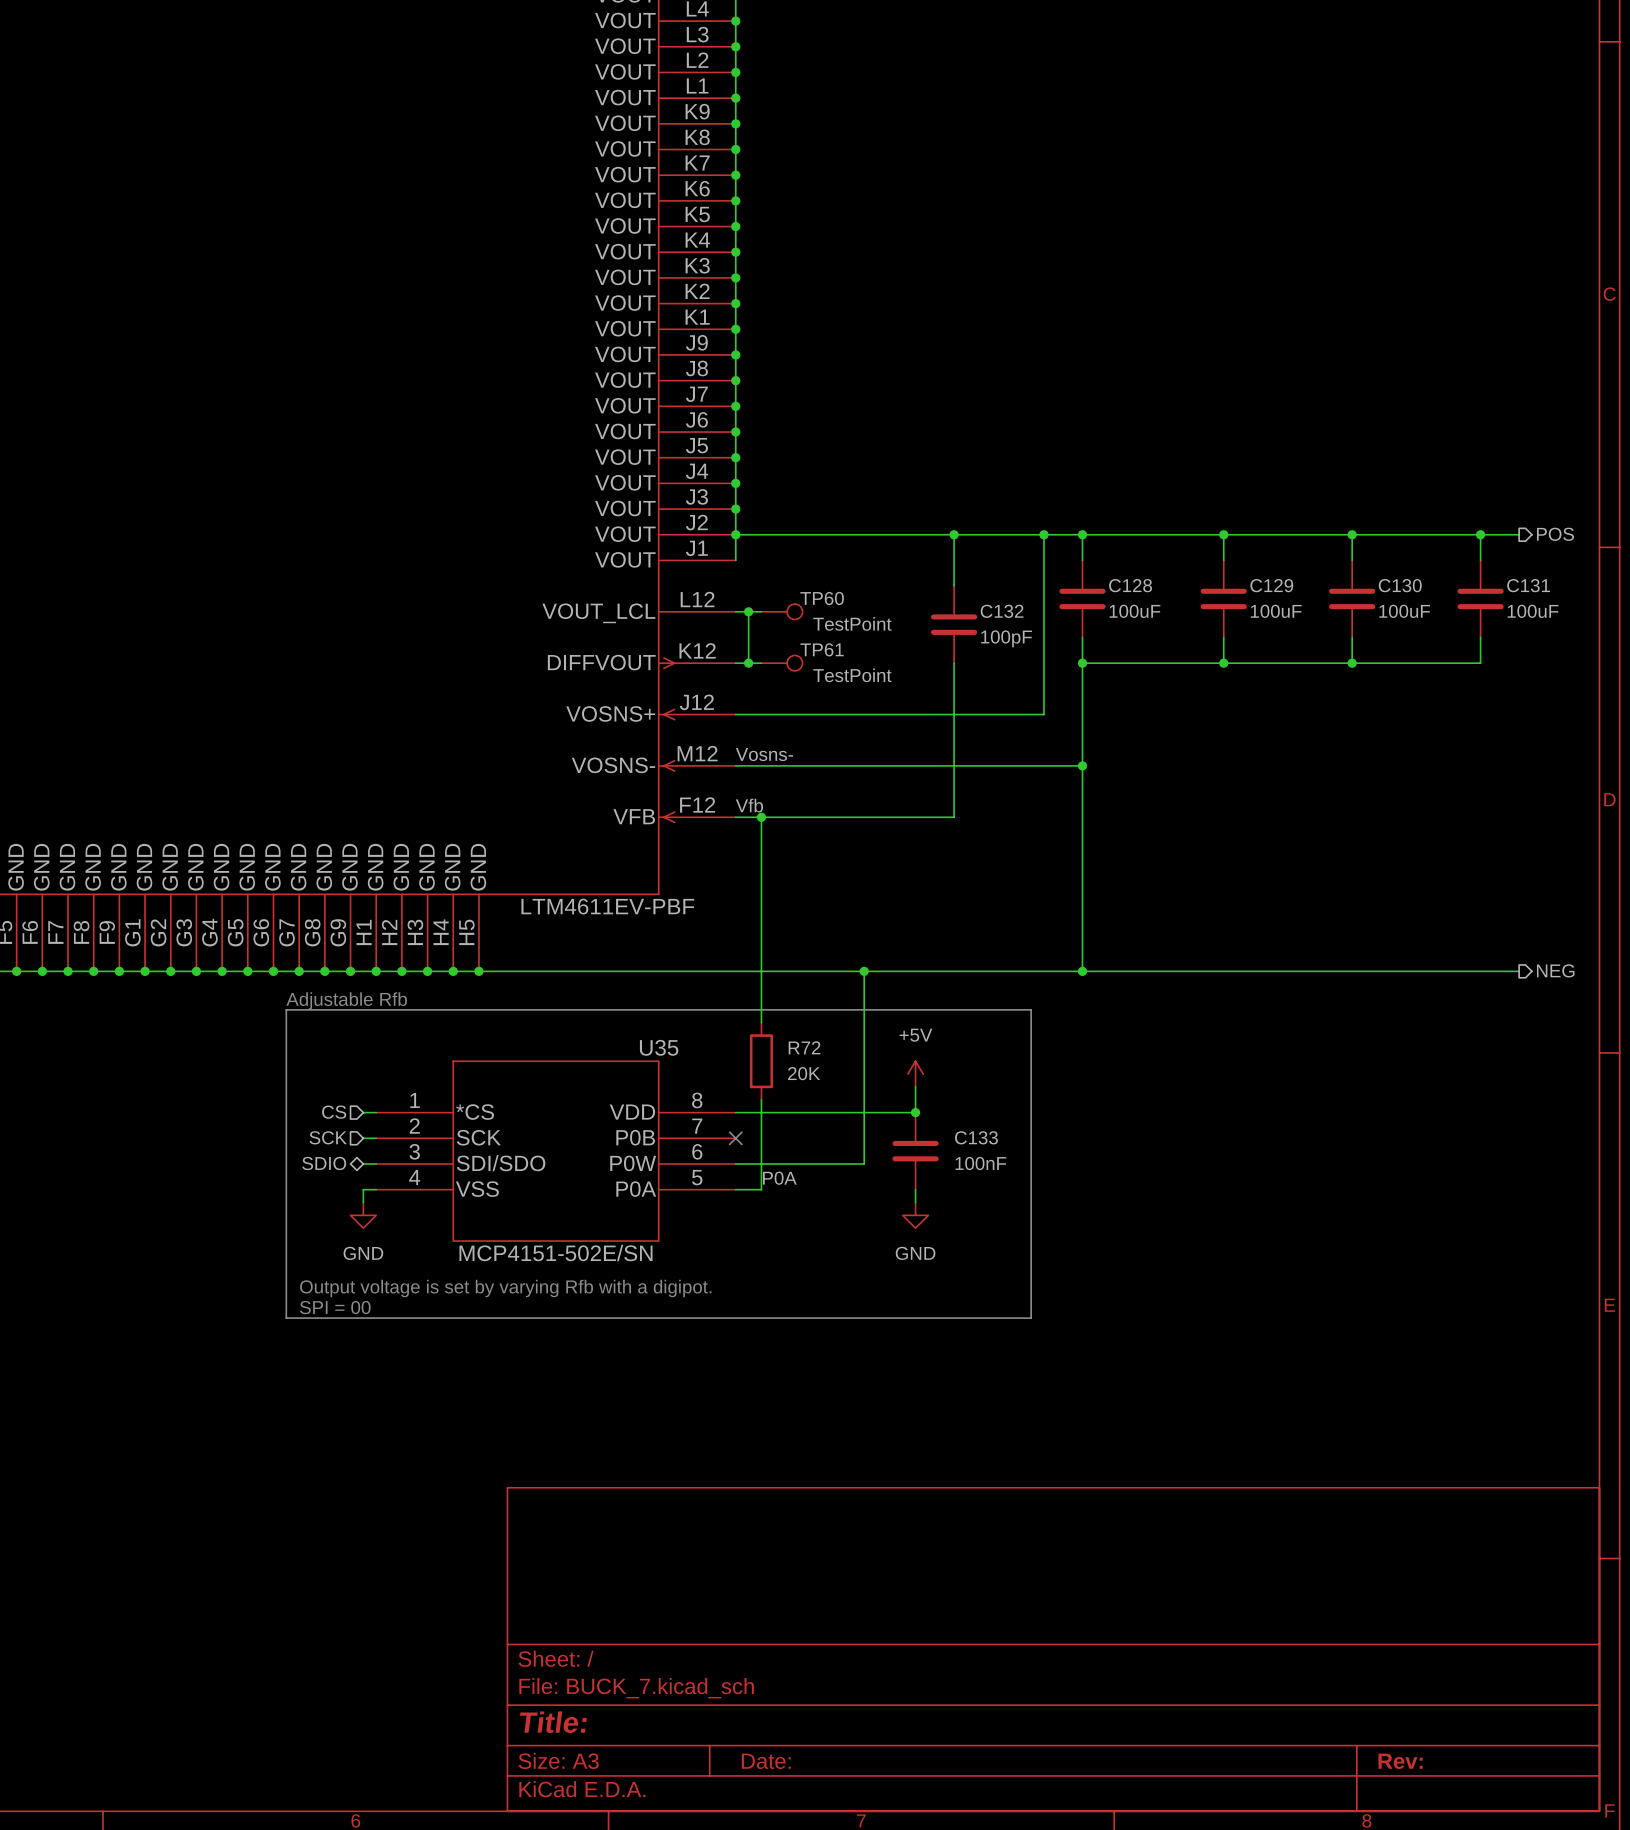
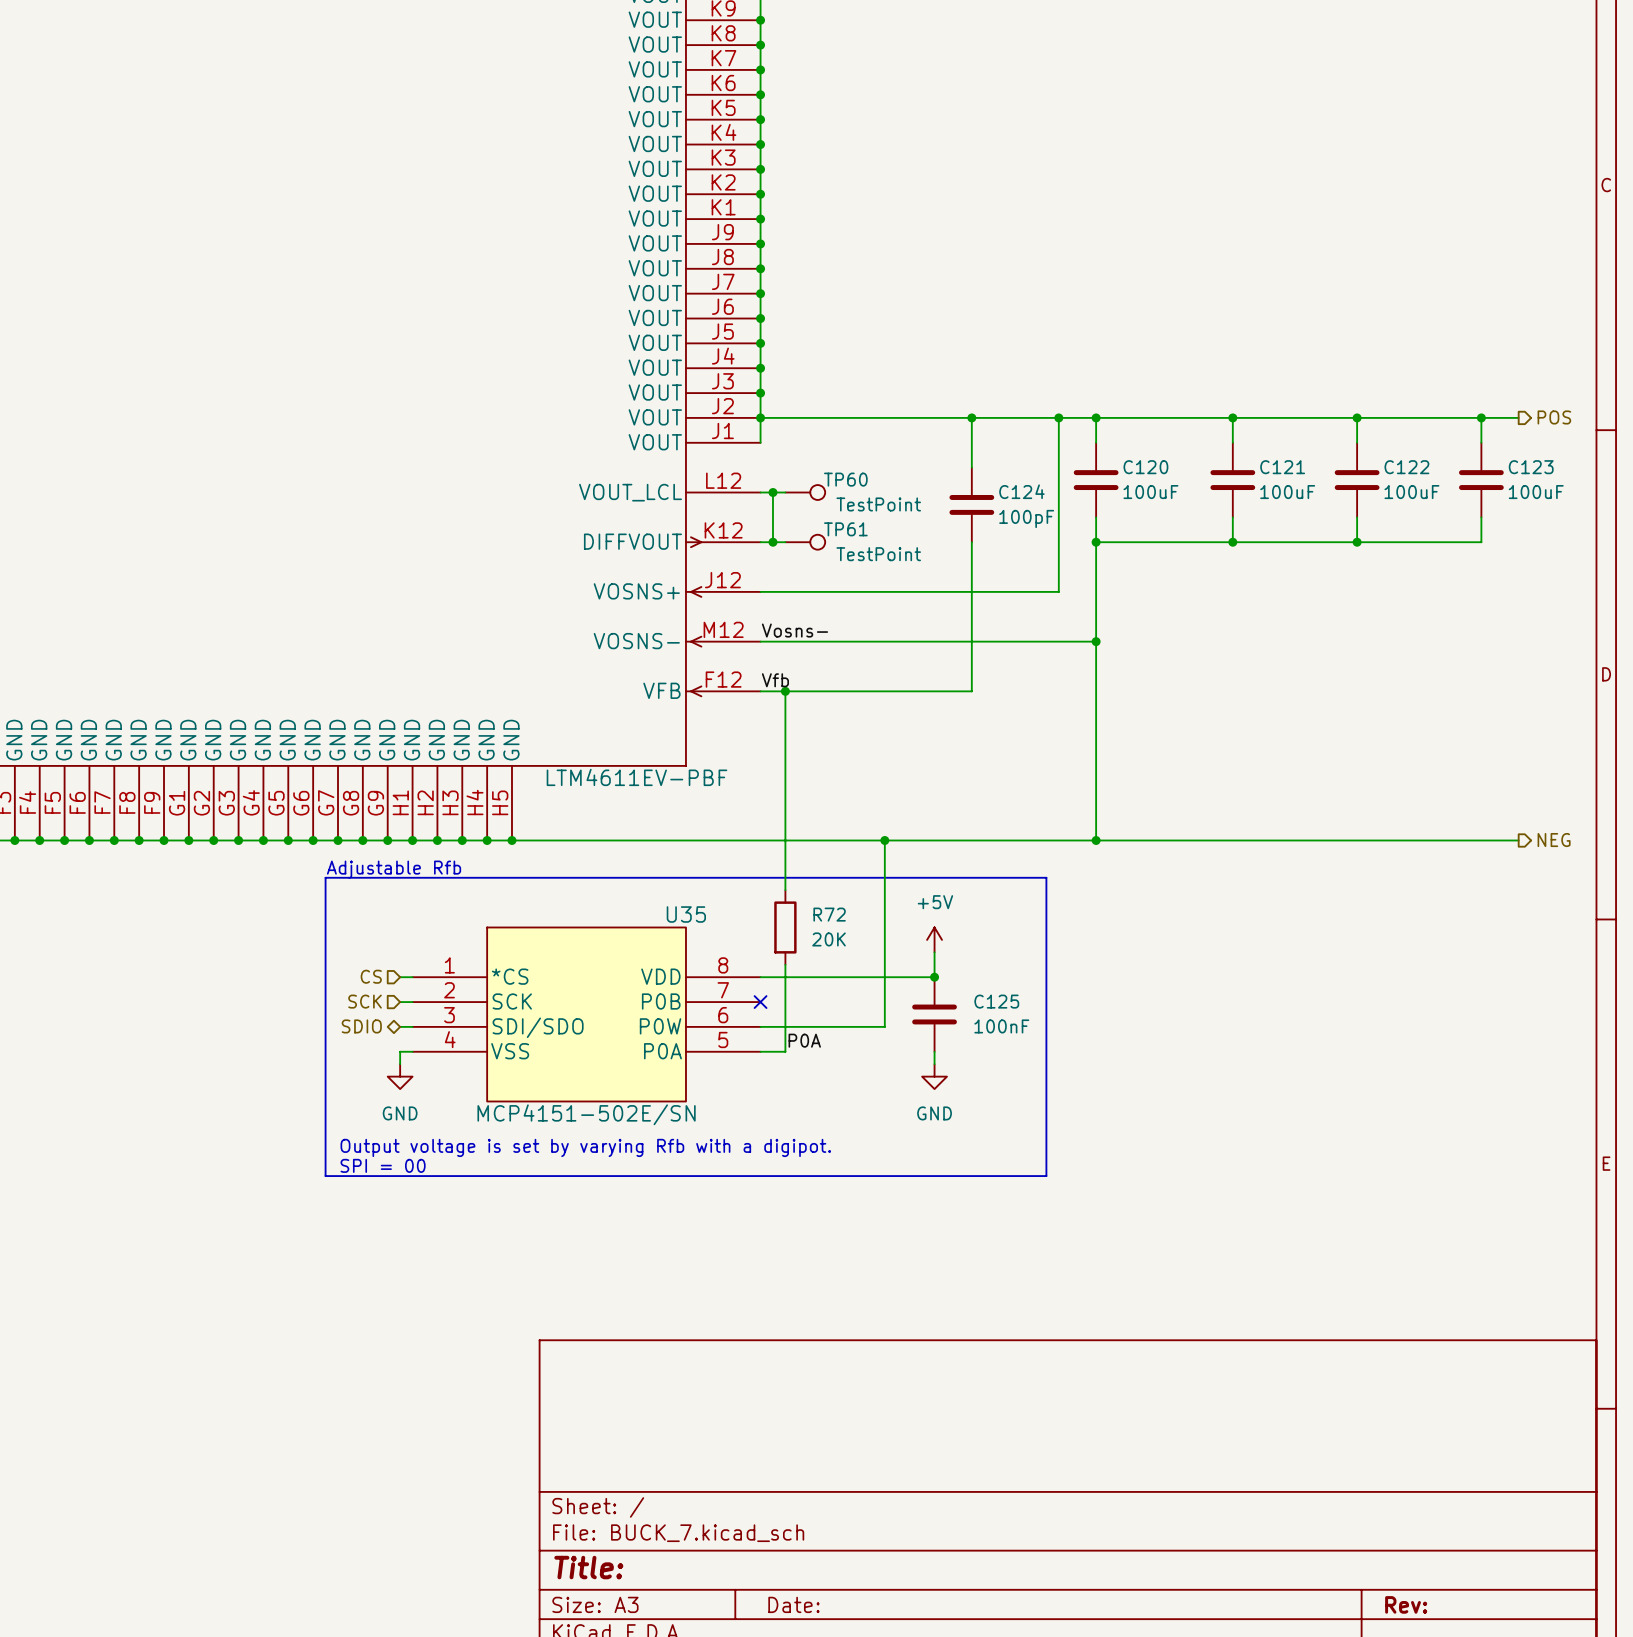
C128 name: C128 (1130, 585) -> C120 (1145, 467)
C129 name: C129 (1271, 585) -> C121 (1282, 467)
C130 name: C130 (1400, 585) -> C122 (1406, 467)
C131 name: C131 (1528, 585) -> C123 (1531, 467)
C132 name: C132 (1002, 611) -> C124 (1021, 491)
C133 name: C133 (976, 1137) -> C125 (996, 1001)

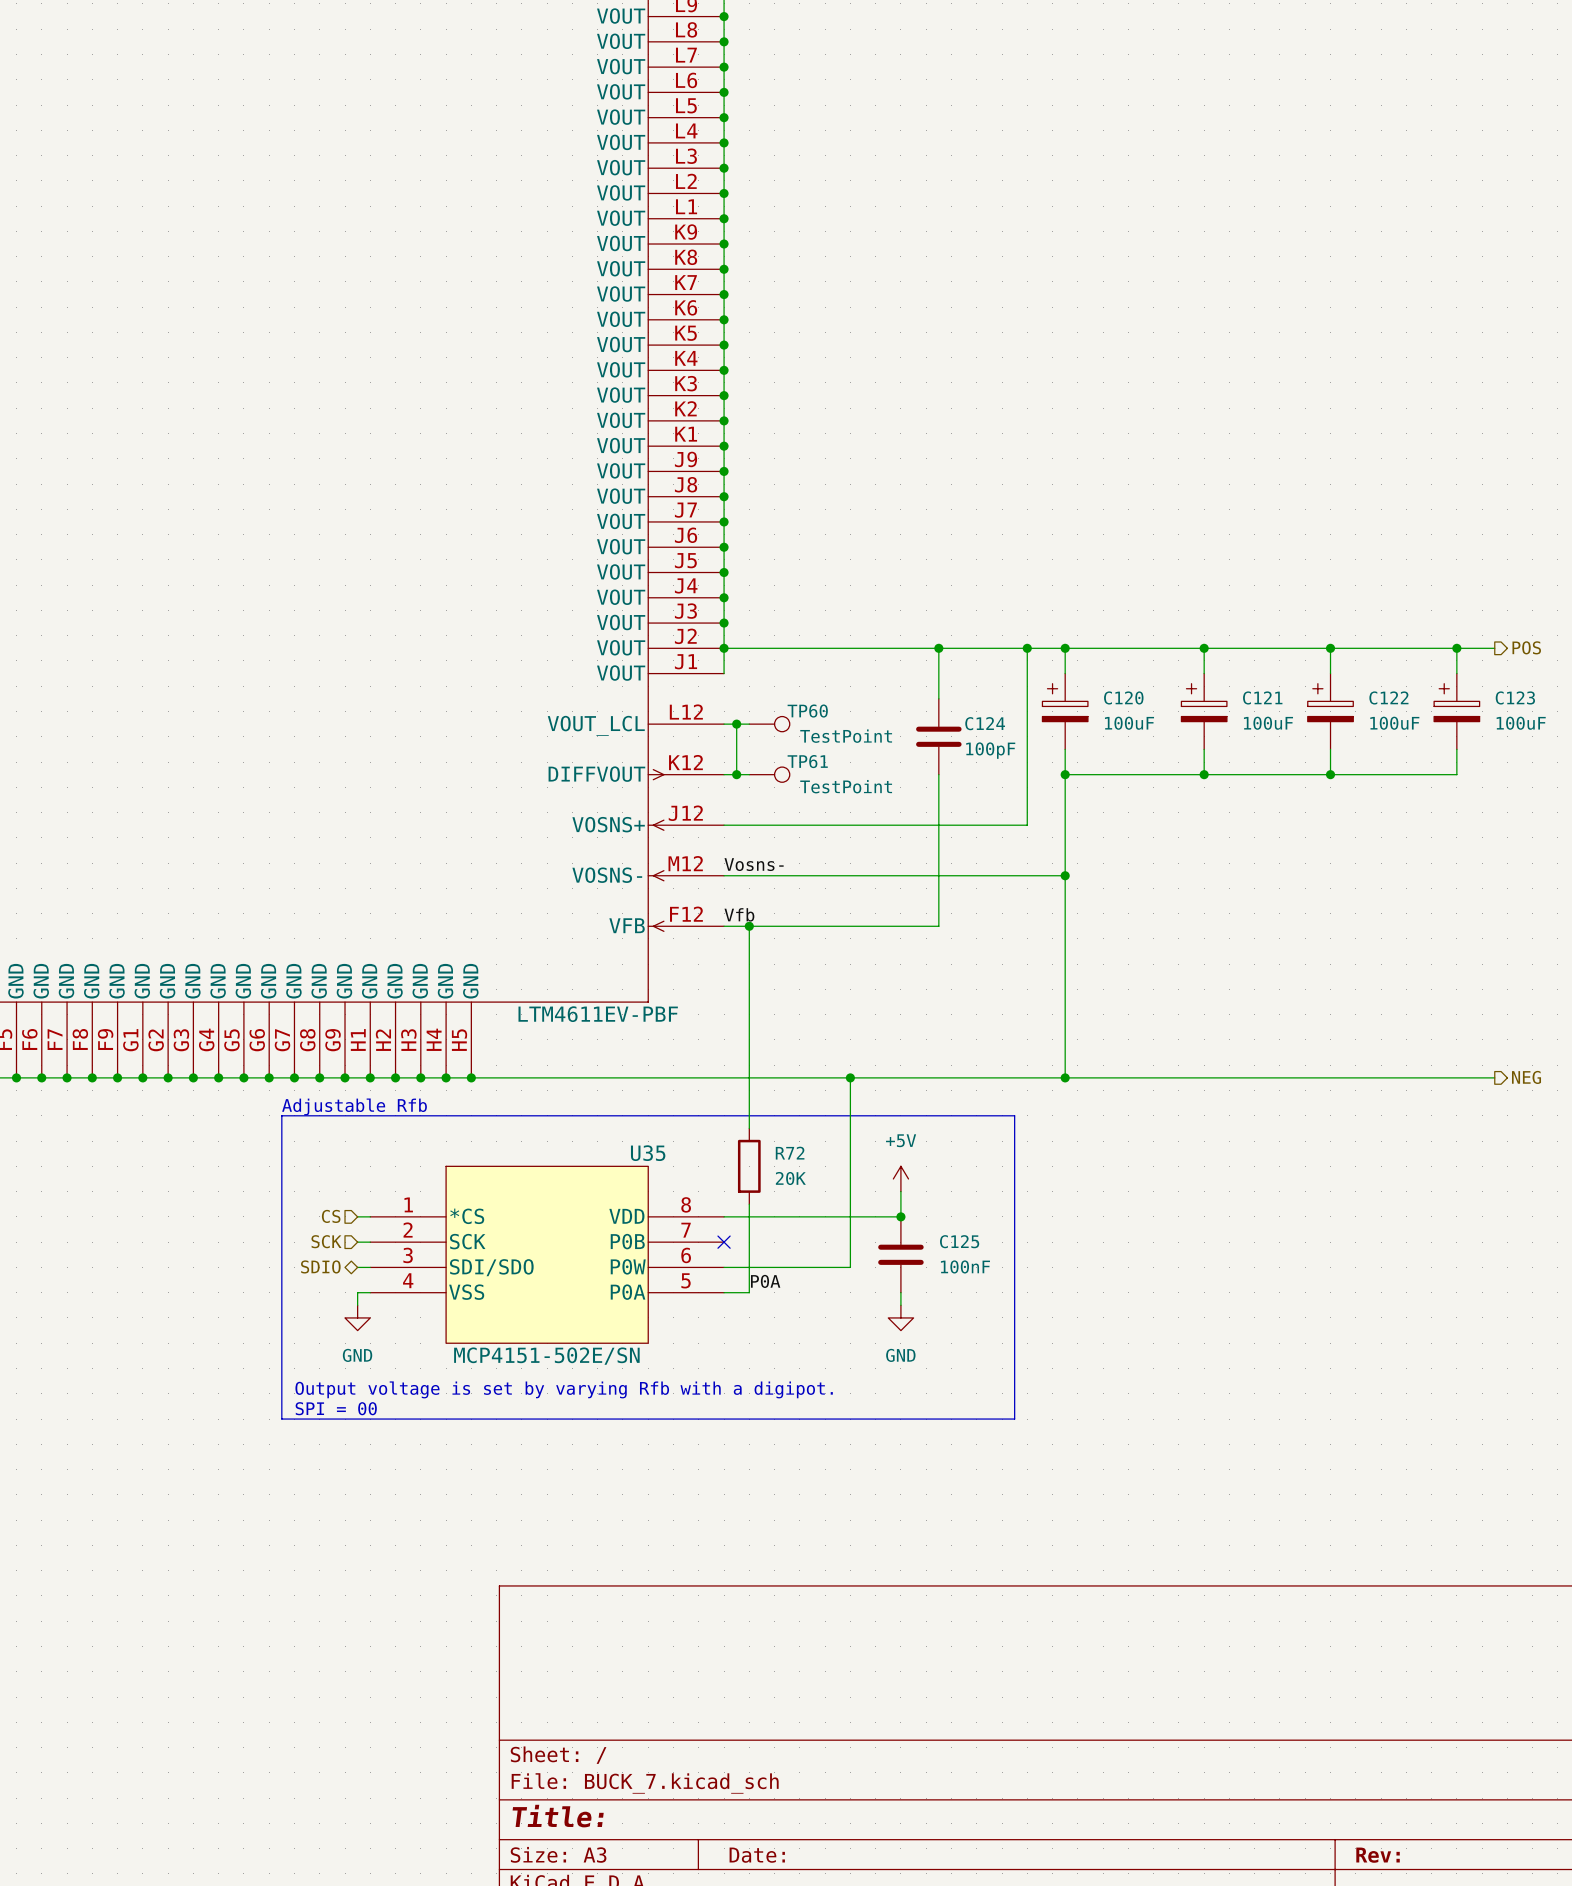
C120 symbol: [1073, 442, 1119, 518] -> [1042, 673, 1088, 750]
C121 symbol: [1210, 442, 1256, 518] -> [1181, 673, 1227, 750]
C122 symbol: [1334, 442, 1380, 518] -> [1307, 673, 1354, 750]
C123 symbol: [1459, 442, 1504, 518] -> [1434, 673, 1480, 750]

